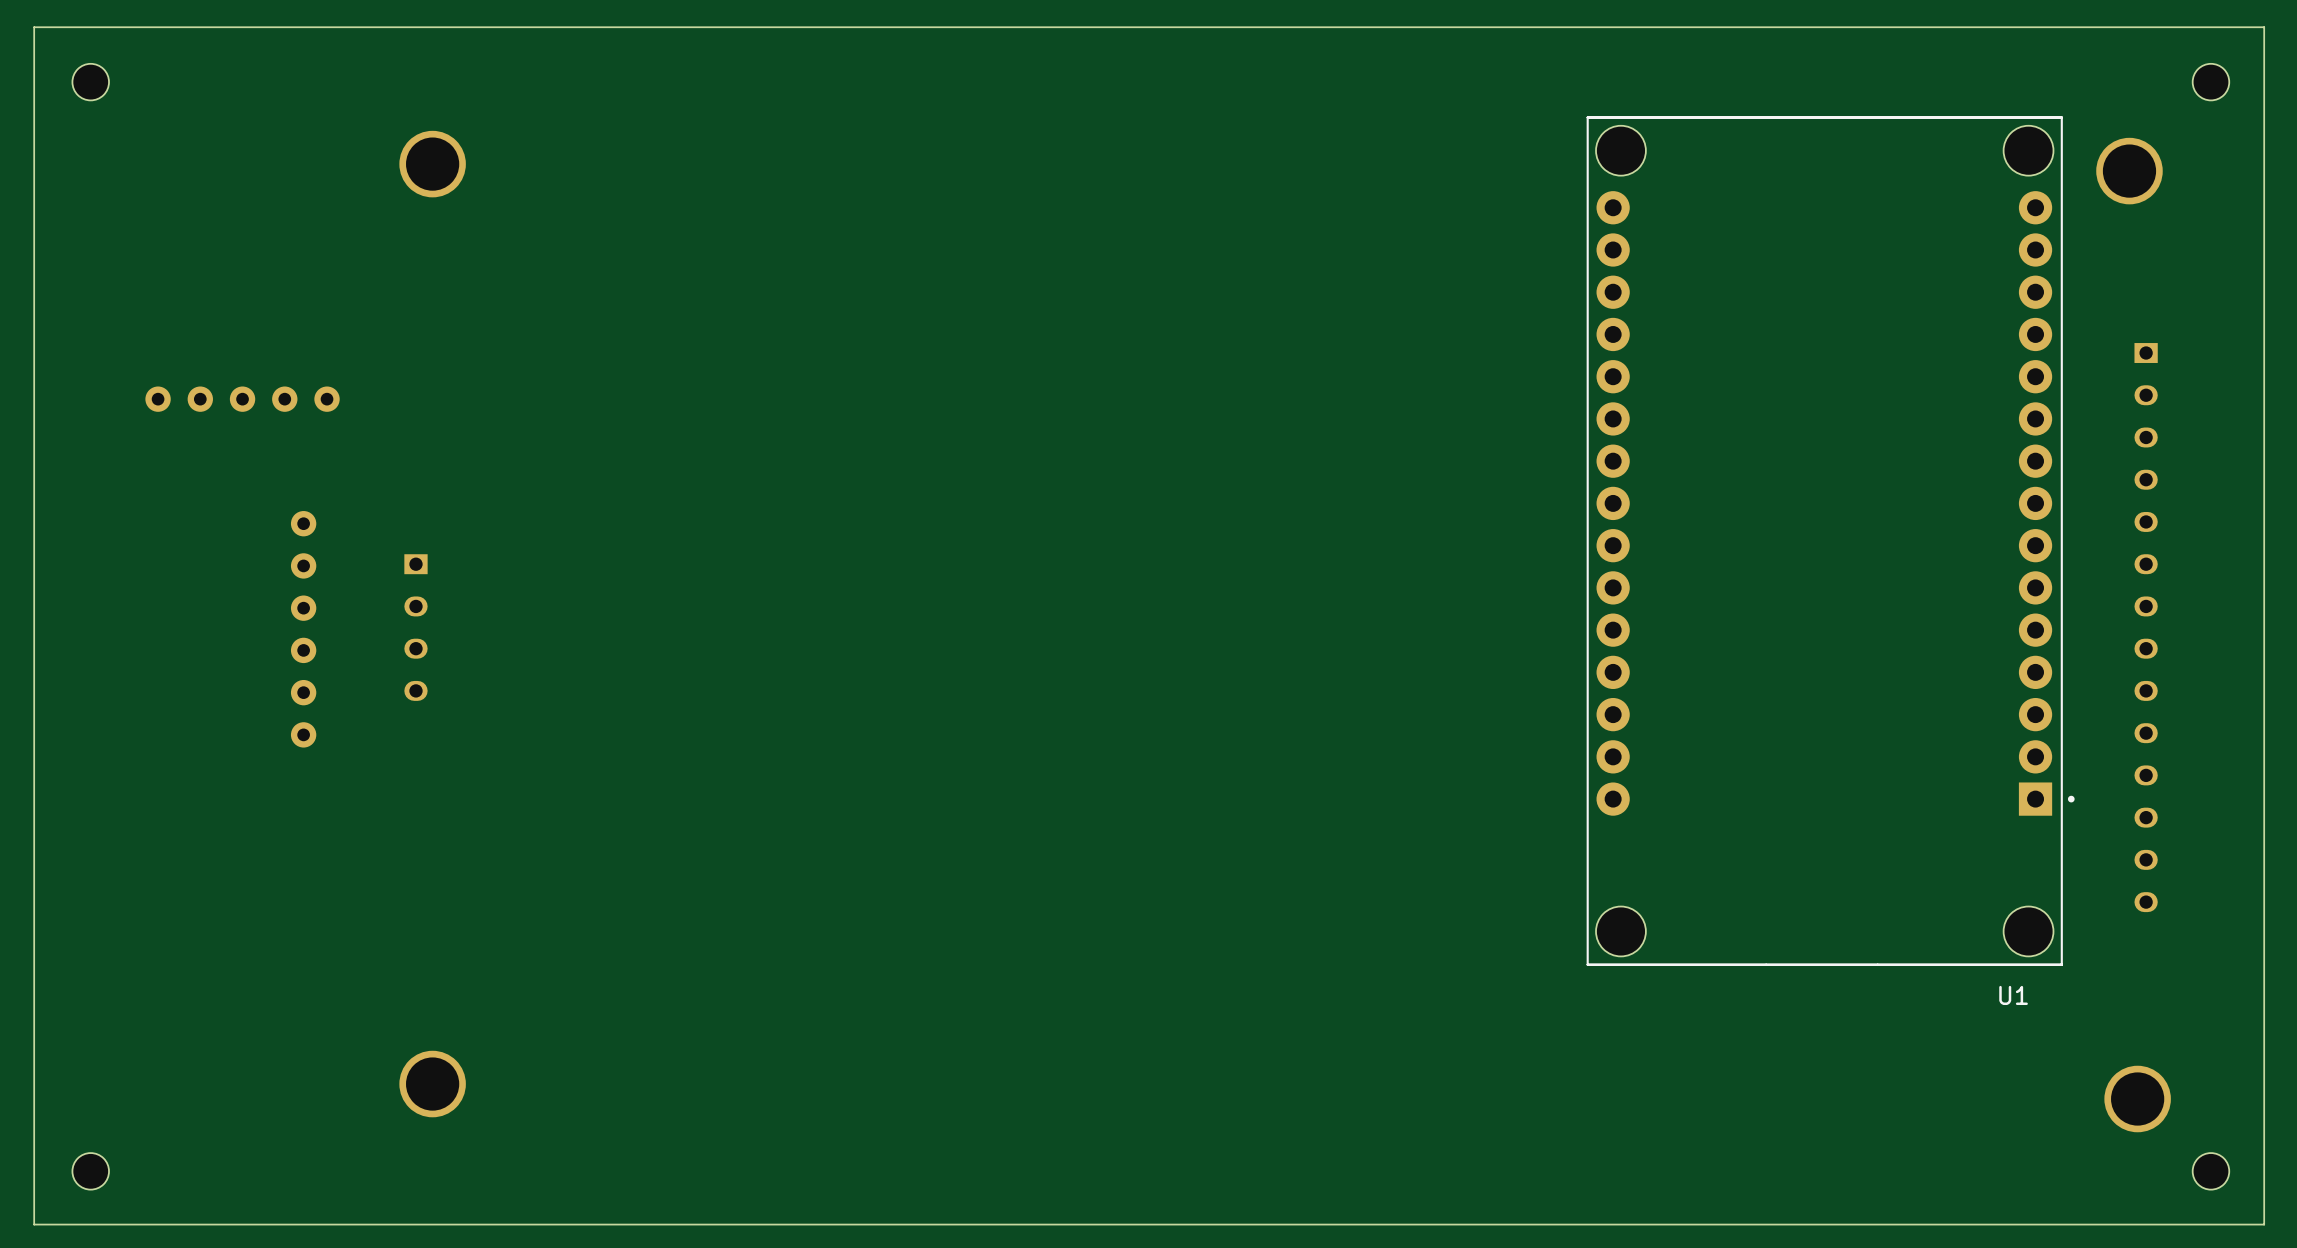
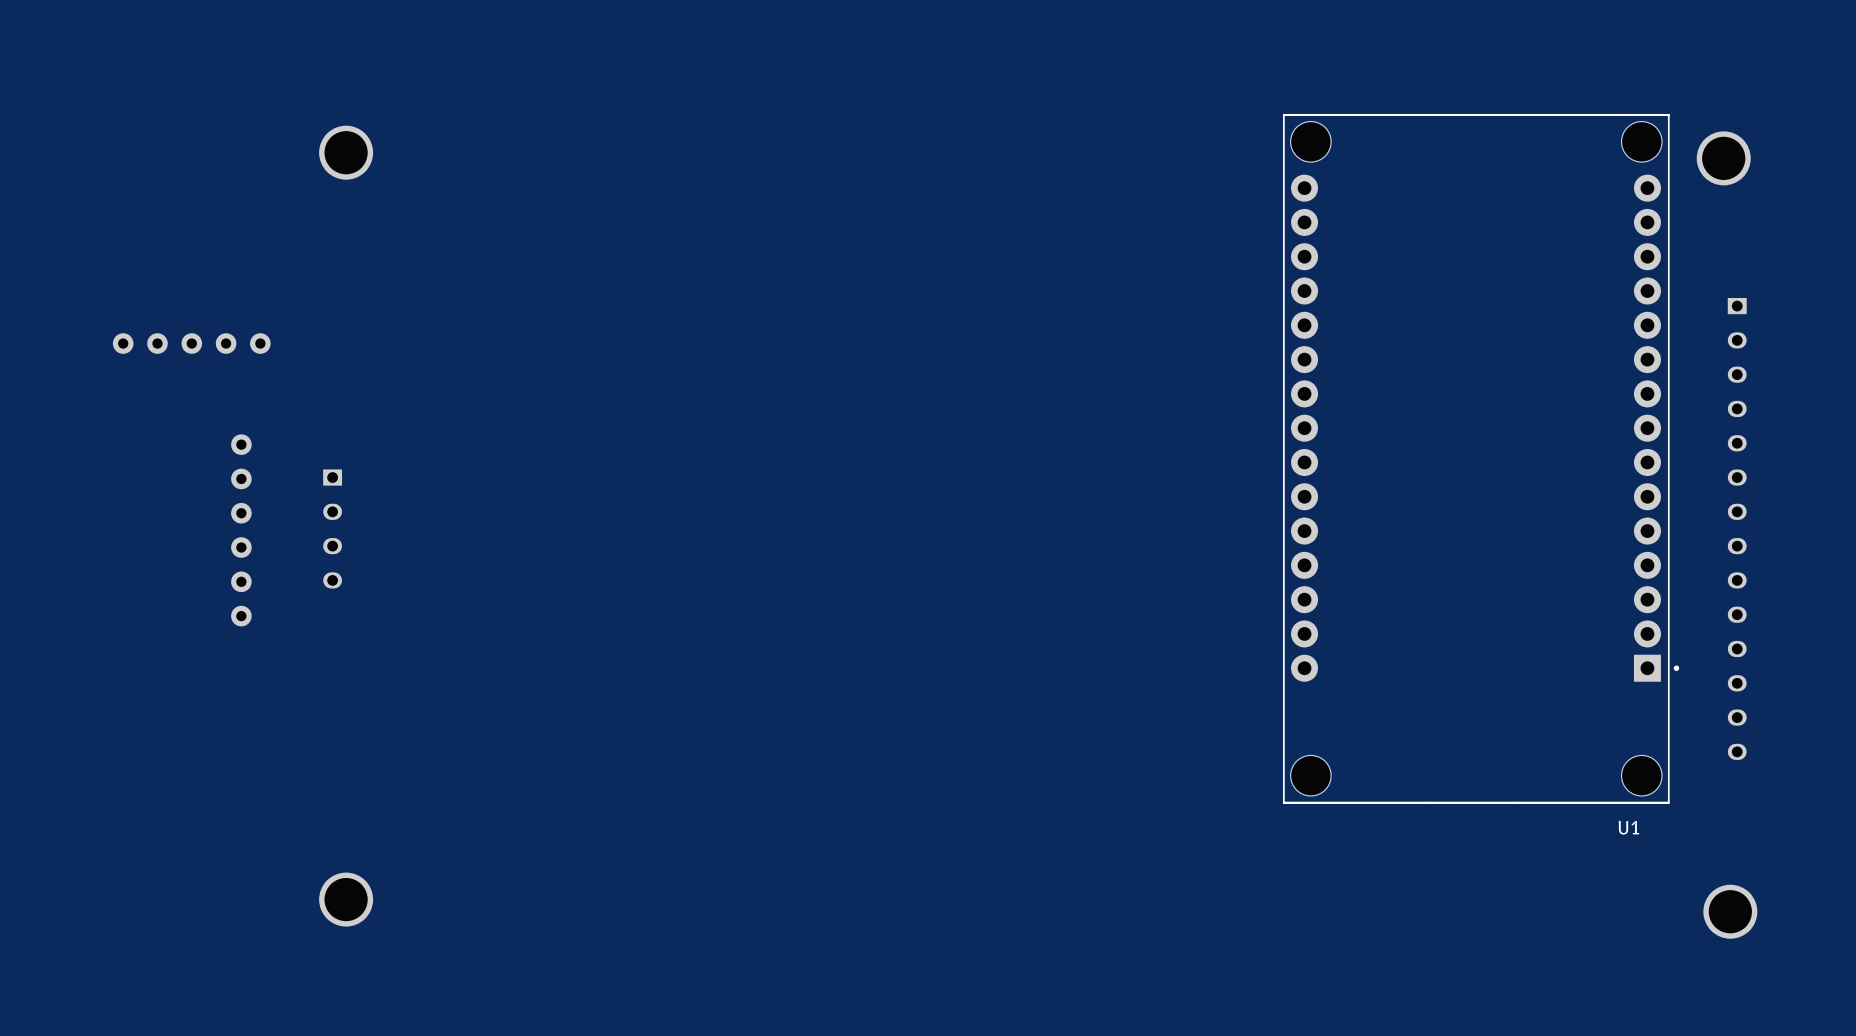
board edge: (2264, 27) (34, 27) (34, 1224) (2264, 1224) (2264, 27) -> none
part: (90, 82) -> none
part: (2210, 82) -> none
part: (90, 1171) -> none
part: (2210, 1171) -> none

